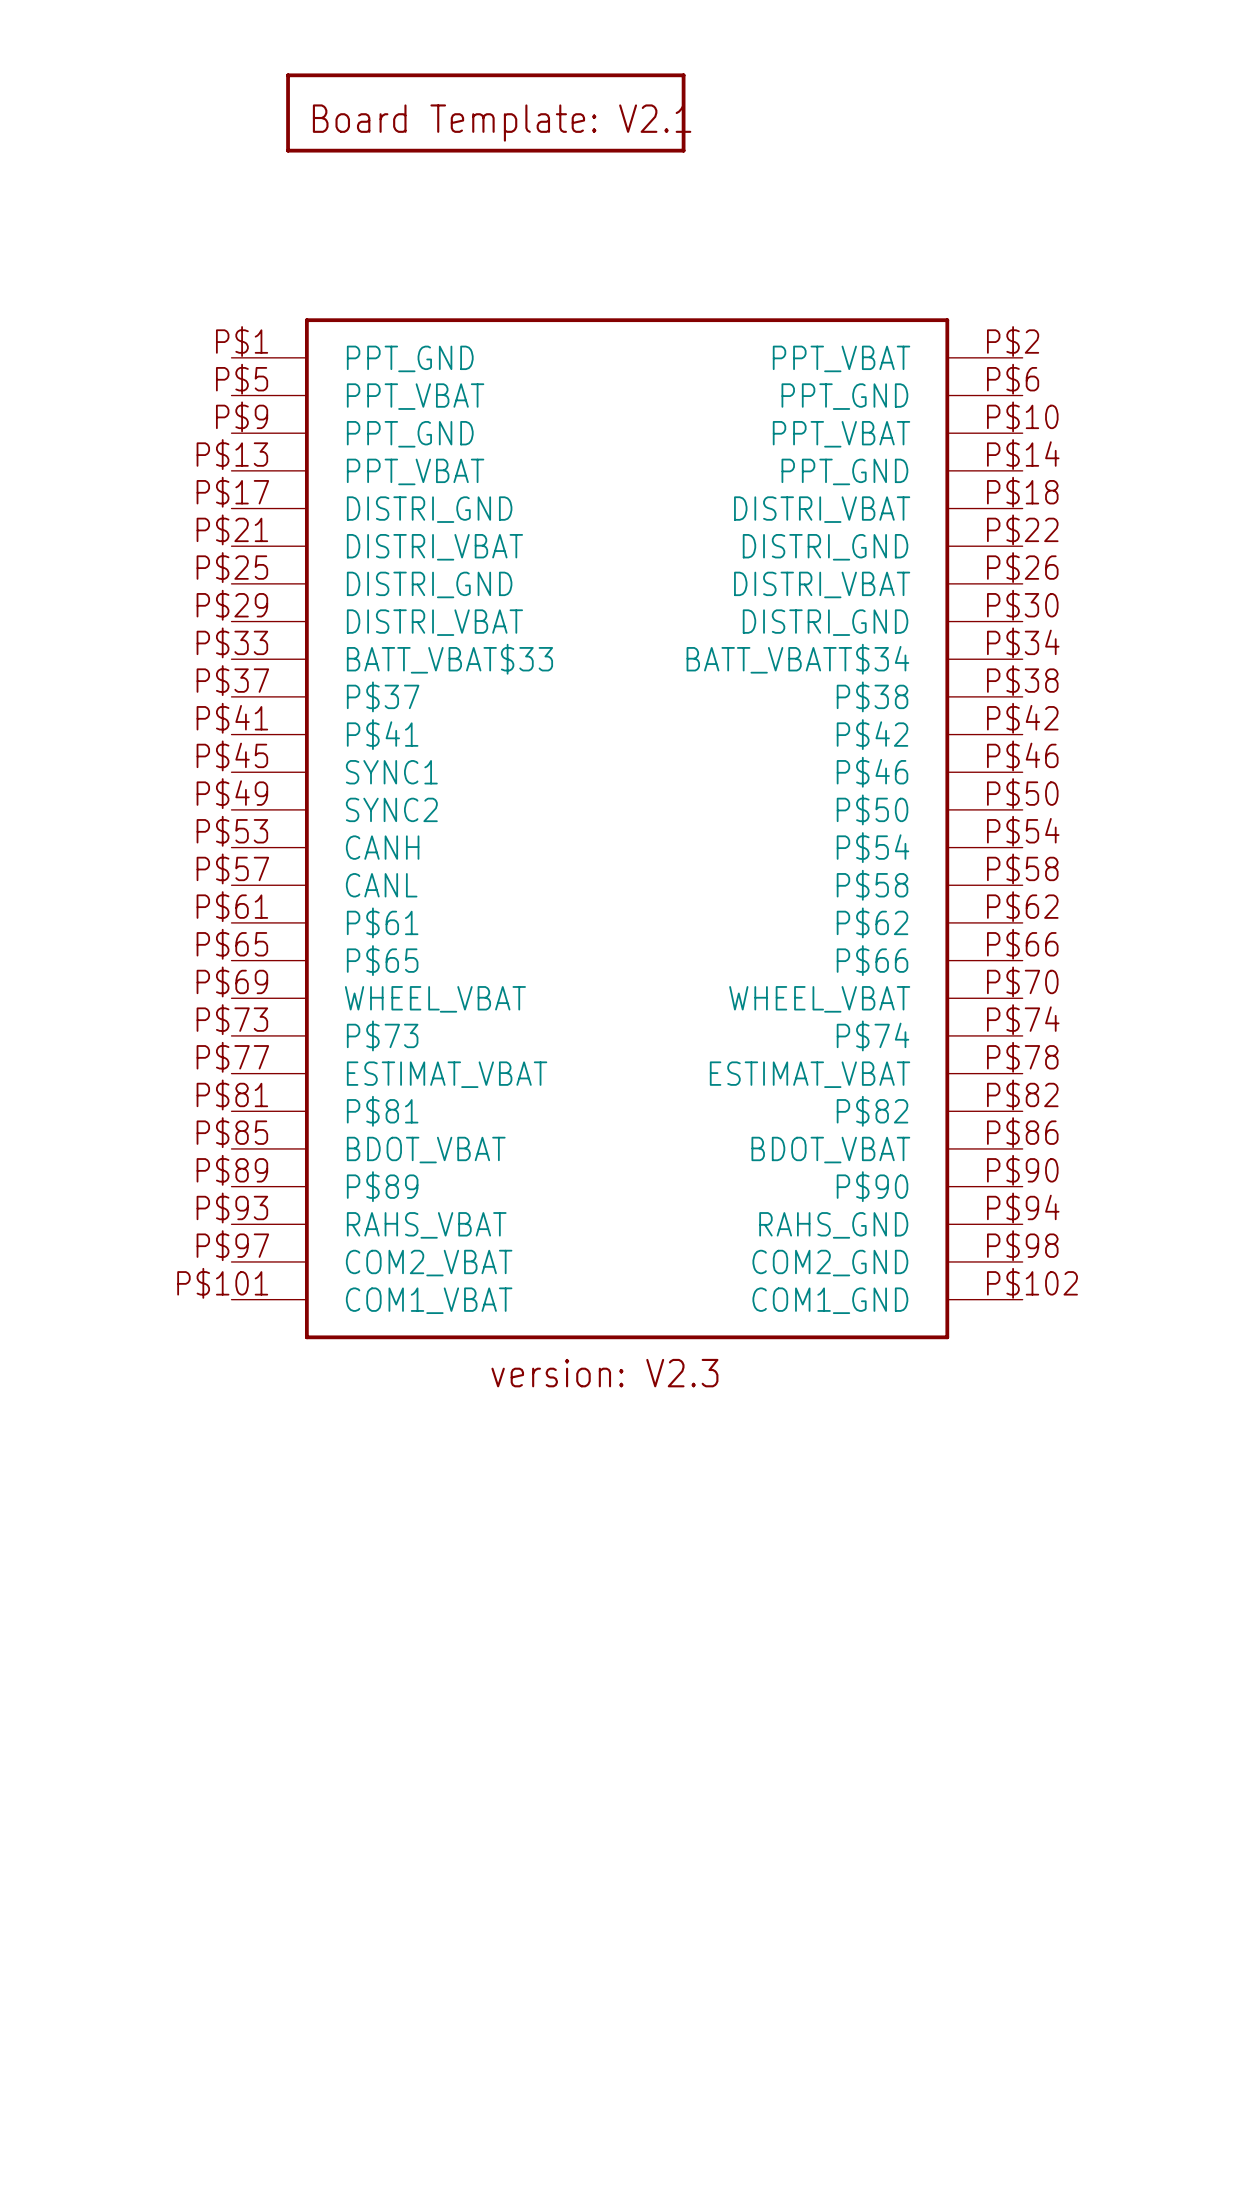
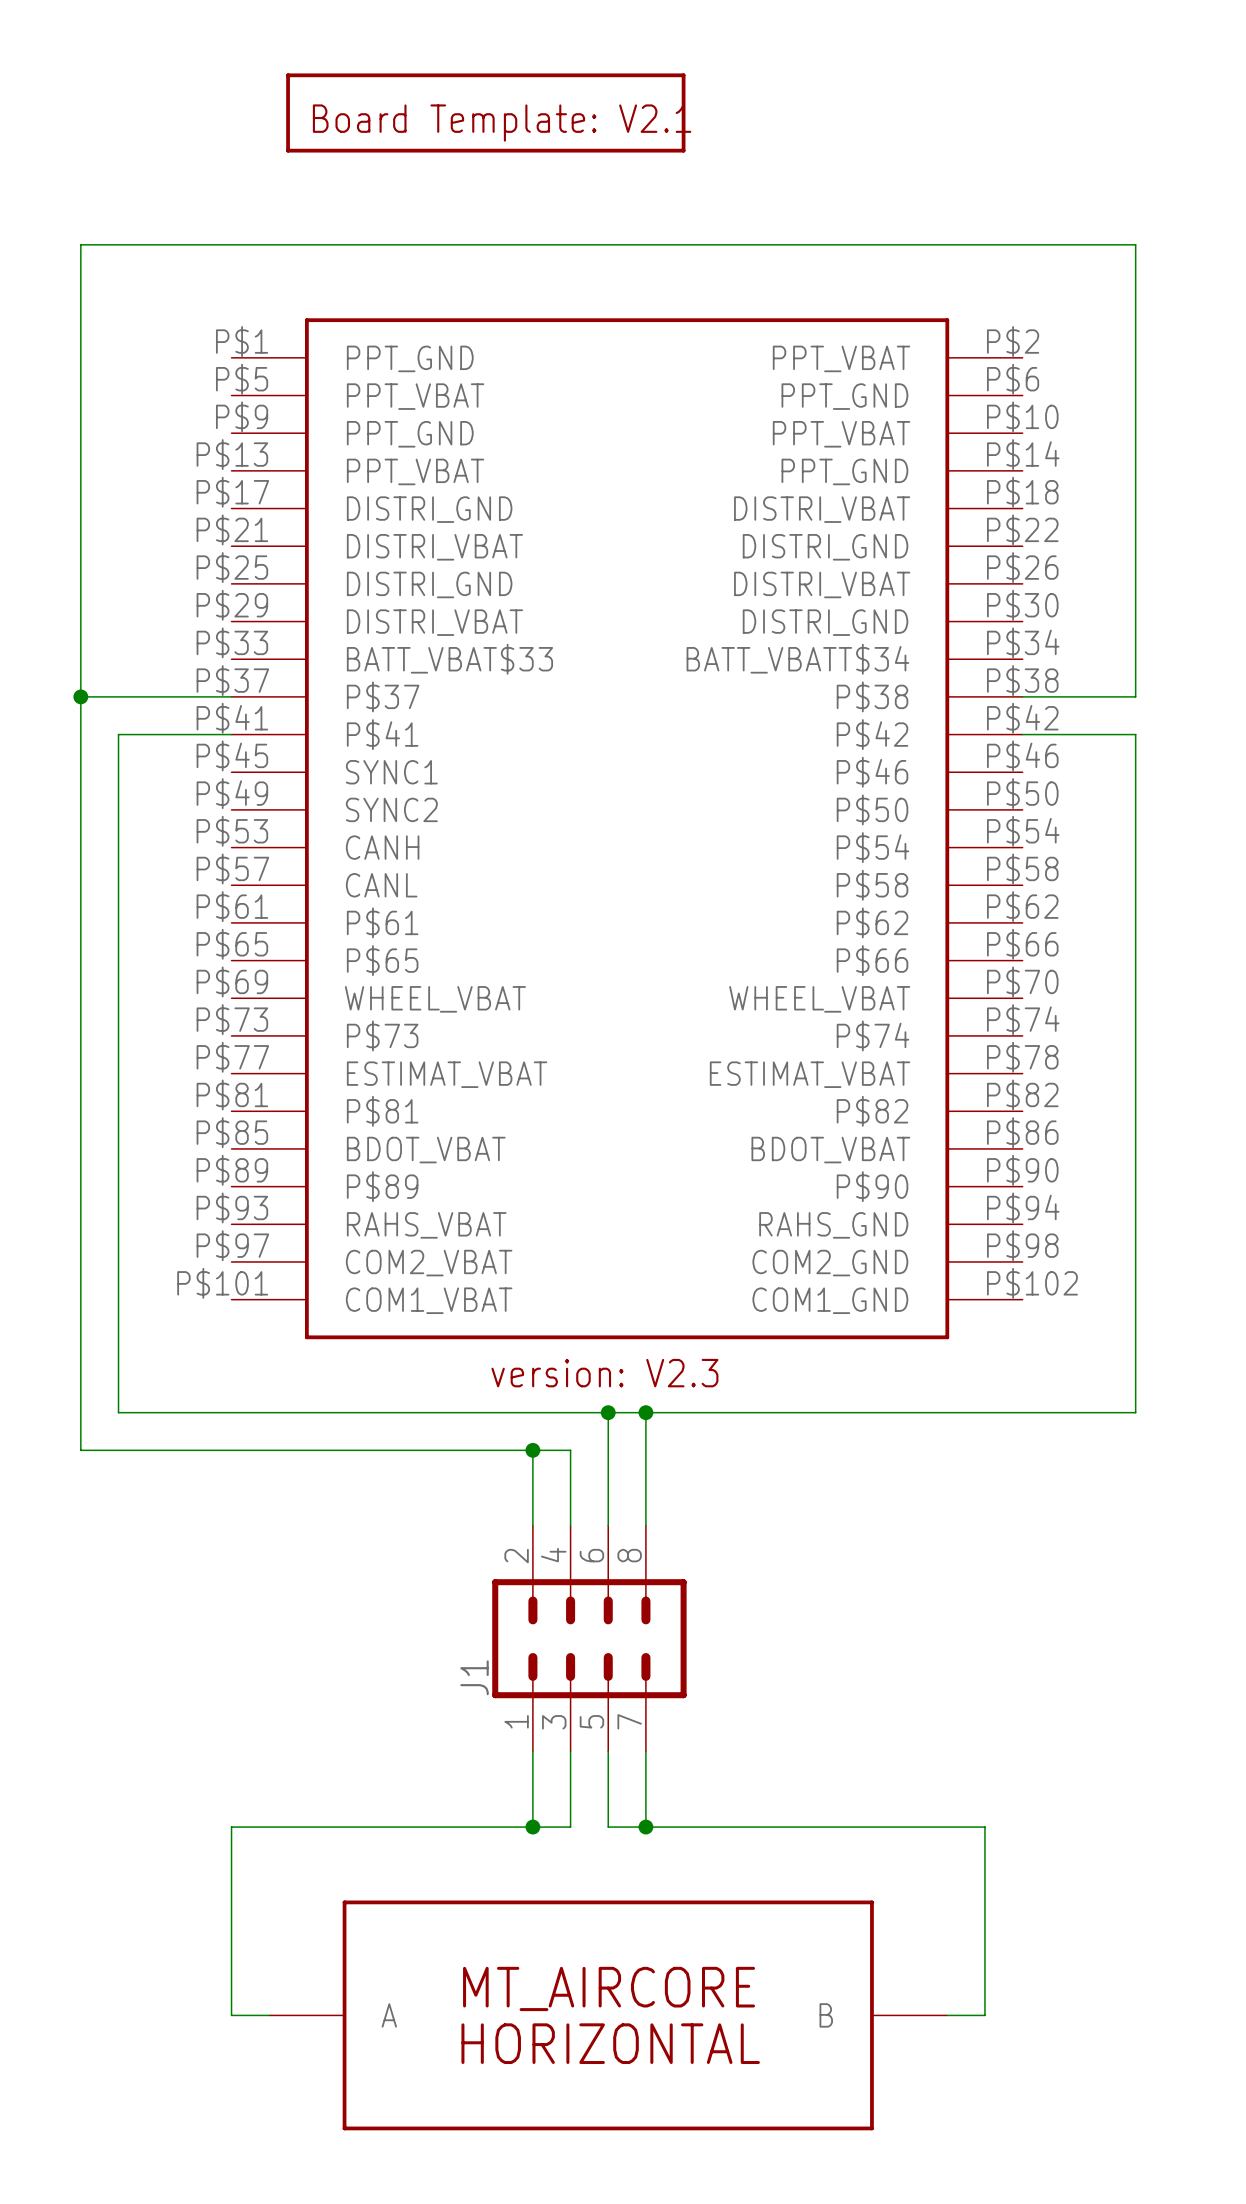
wire: none -> (80, 696) (231, 696)
junction: none -> (80, 696)
wire: none -> (1022, 696) (1135, 696) (1135, 244) (80, 244) (80, 1450) (570, 1450) (570, 1525)
wire: none -> (231, 734) (118, 734) (118, 1412) (1135, 1412) (1135, 734) (1022, 734)
wire: none -> (608, 1412) (608, 1525)
junction: none -> (608, 1412)
wire: none -> (645, 1412) (645, 1525)
junction: none -> (645, 1412)
wire: none -> (532, 1450) (532, 1525)
junction: none -> (532, 1450)
J1: none -> (589, 1638)
wire: none -> (532, 1751) (532, 1827)
wire: none -> (570, 1751) (570, 1827) (231, 1827) (231, 2015) (269, 2015)
wire: none -> (608, 1751) (608, 1827) (984, 1827) (984, 2015) (947, 2015)
wire: none -> (645, 1751) (645, 1827)
junction: none -> (532, 1827)
junction: none -> (645, 1827)
part: none -> (608, 2015)

